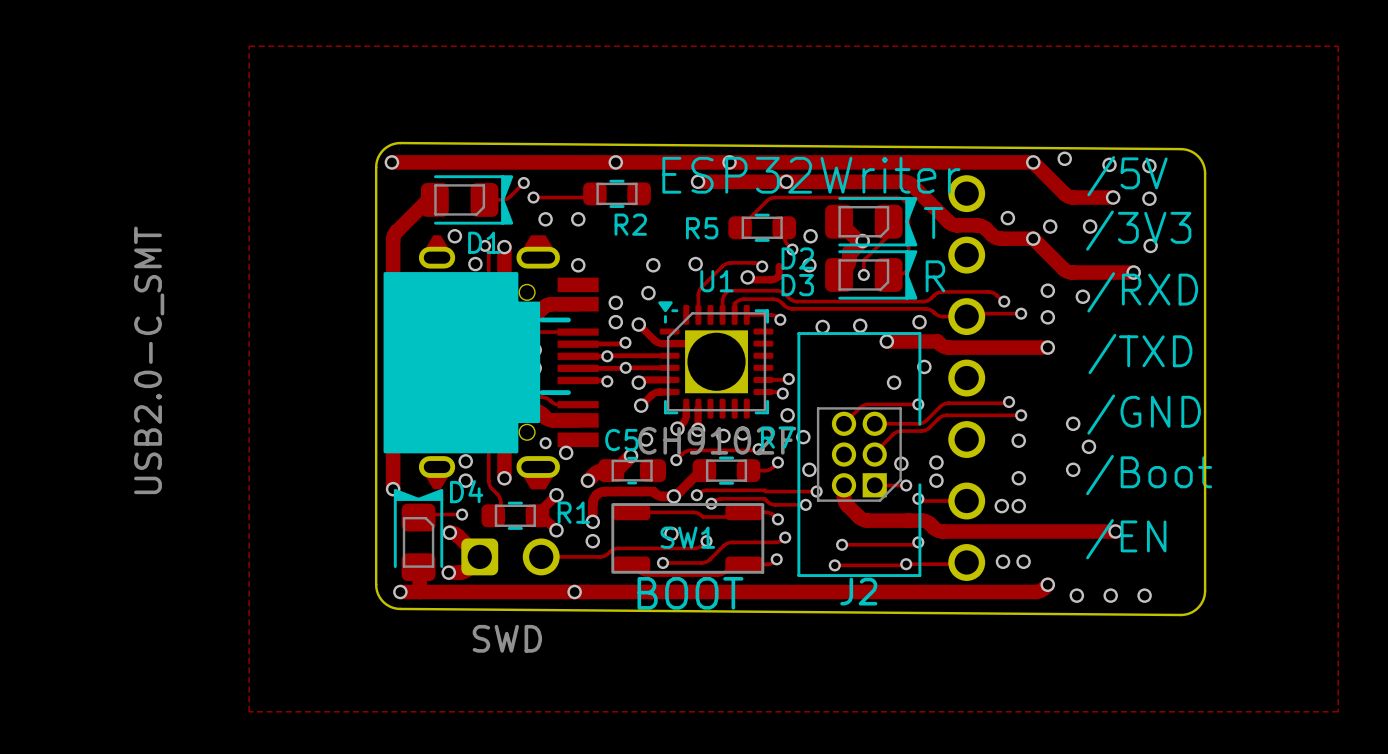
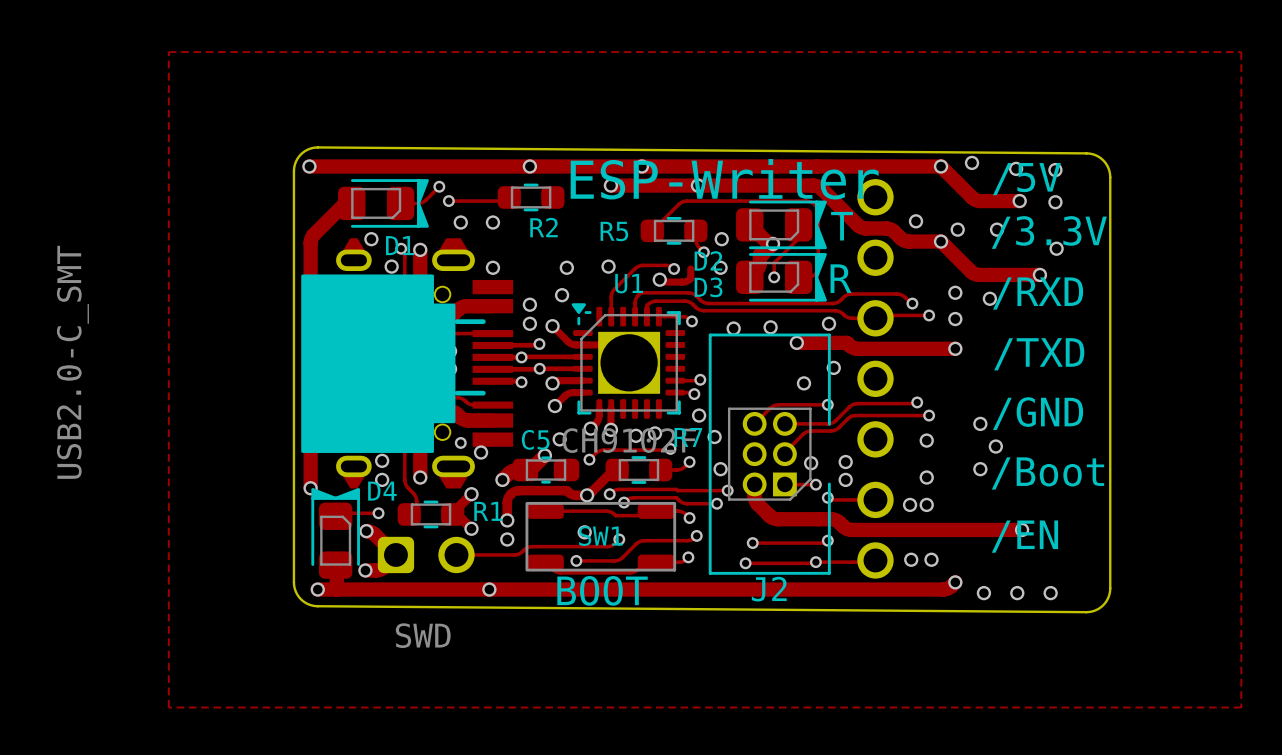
text: ESP32Writer (811, 175) -> ESP-Writer (724, 179)
text: /3V3 (1138, 230) -> /3.3V (1049, 232)

